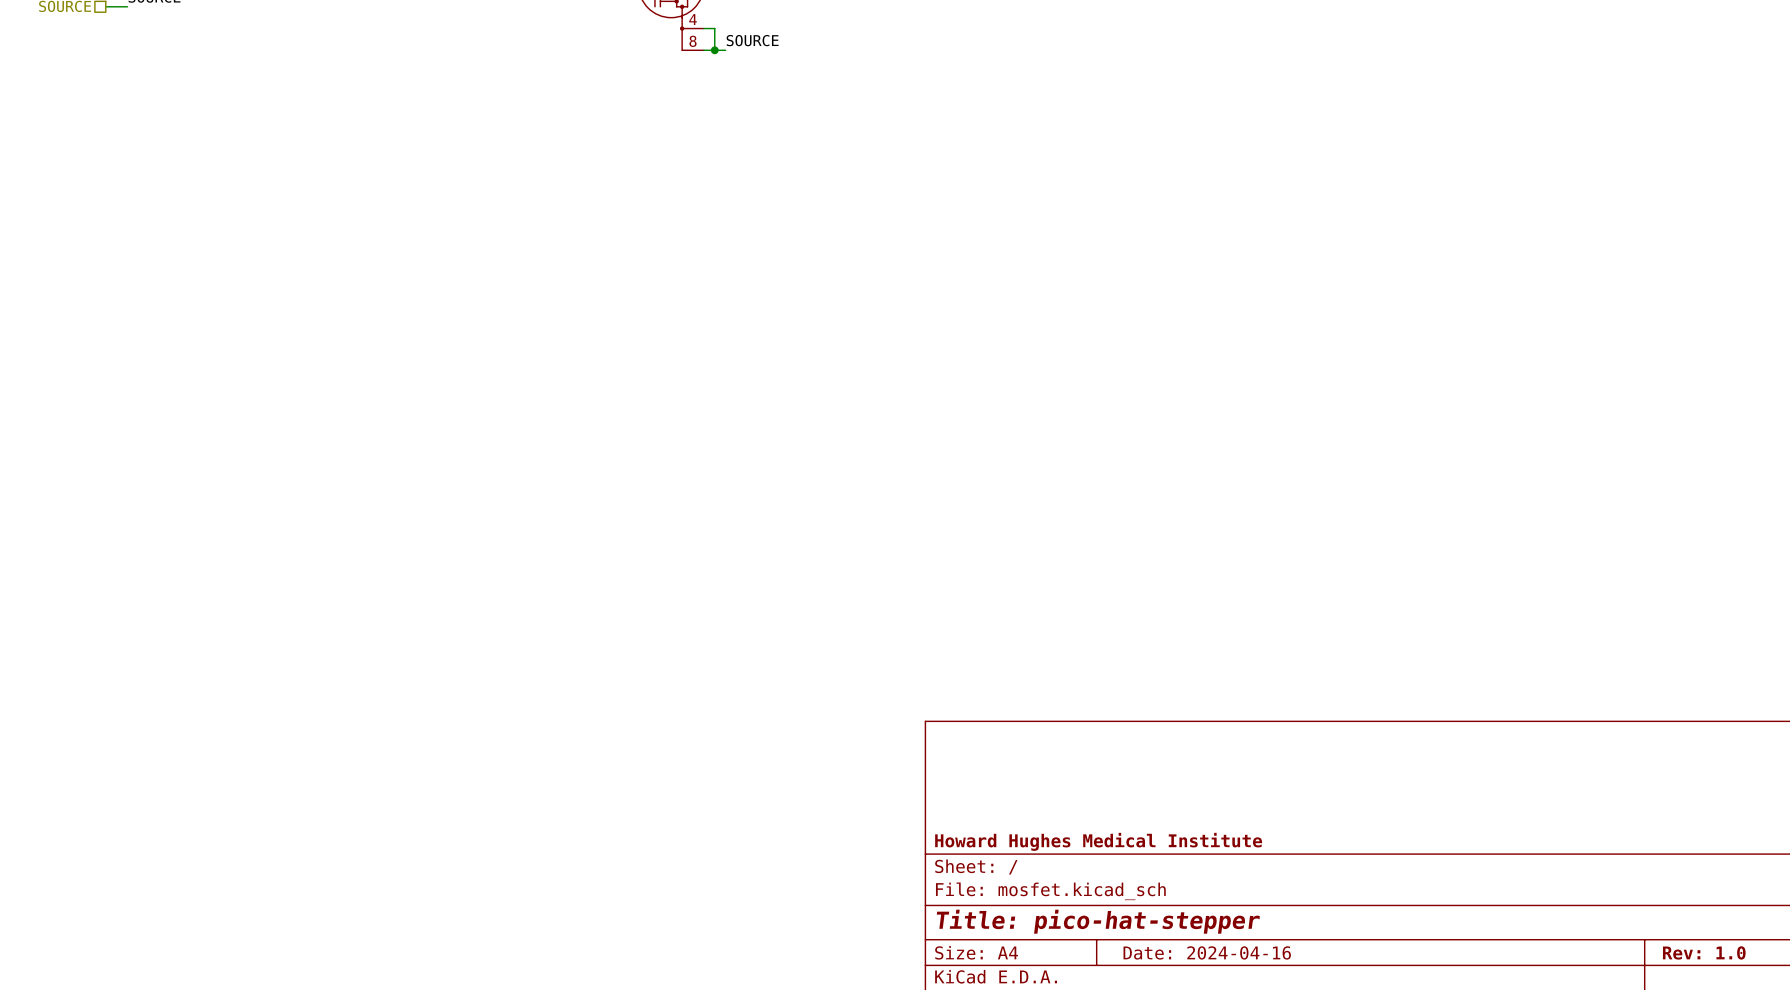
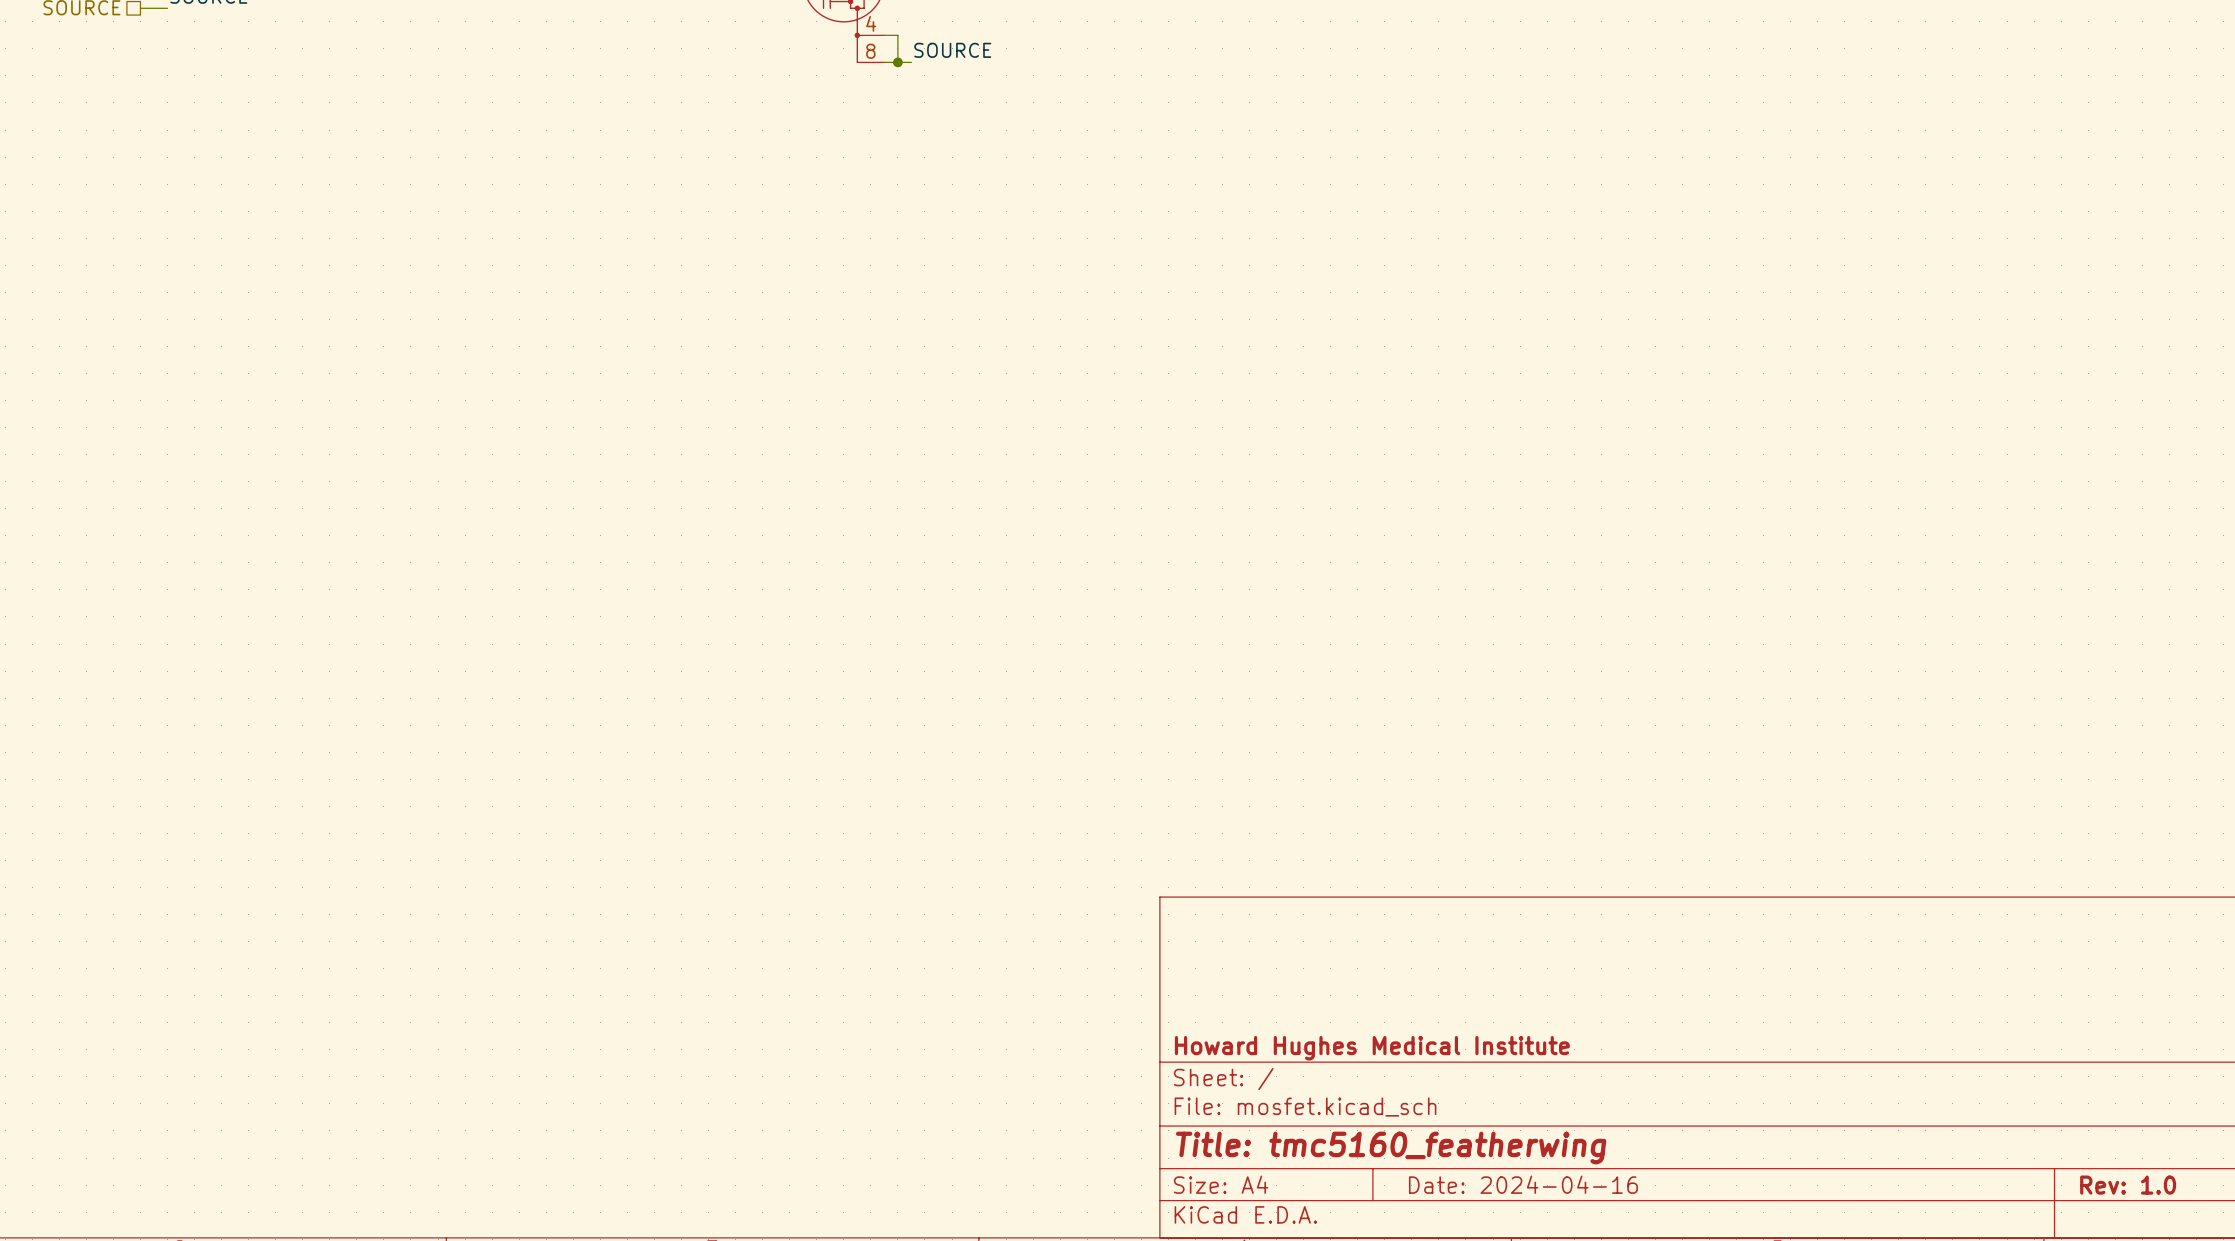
title block: Title: pico-hat-stepper (1098, 921) -> Title: tmc5160_featherwing (1391, 1147)

